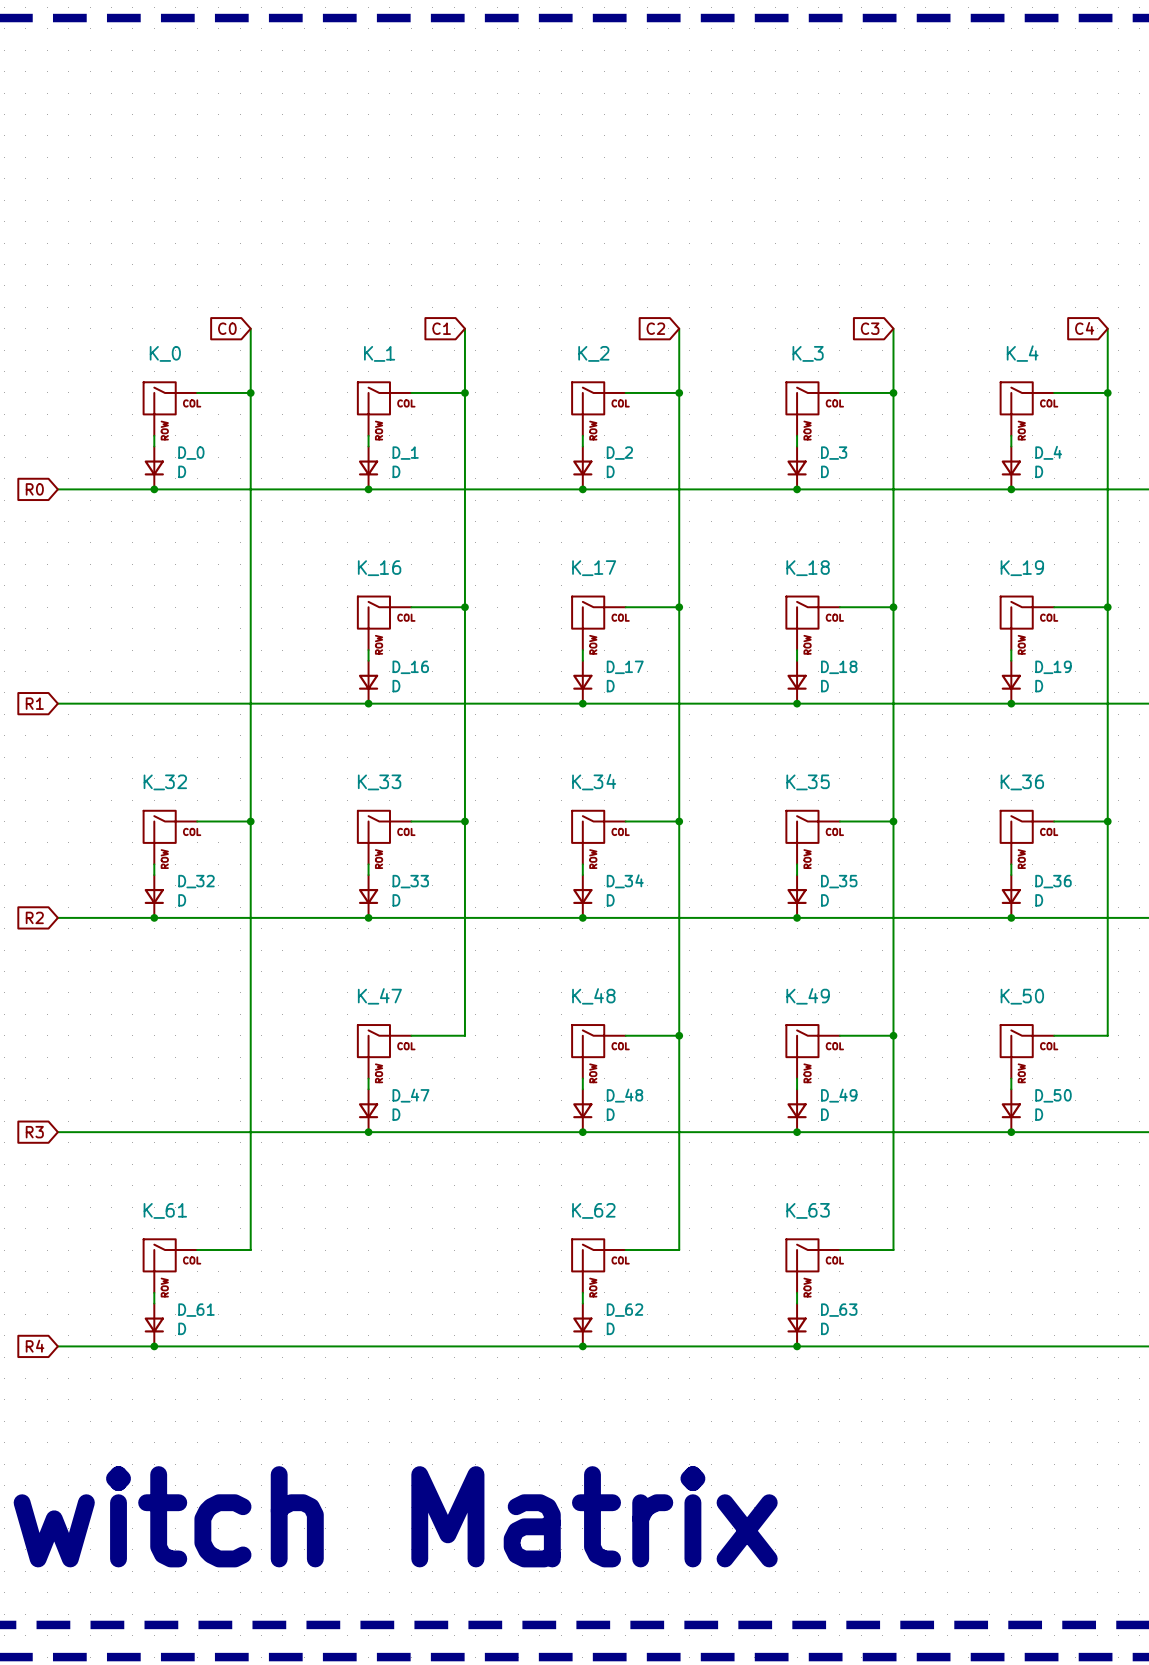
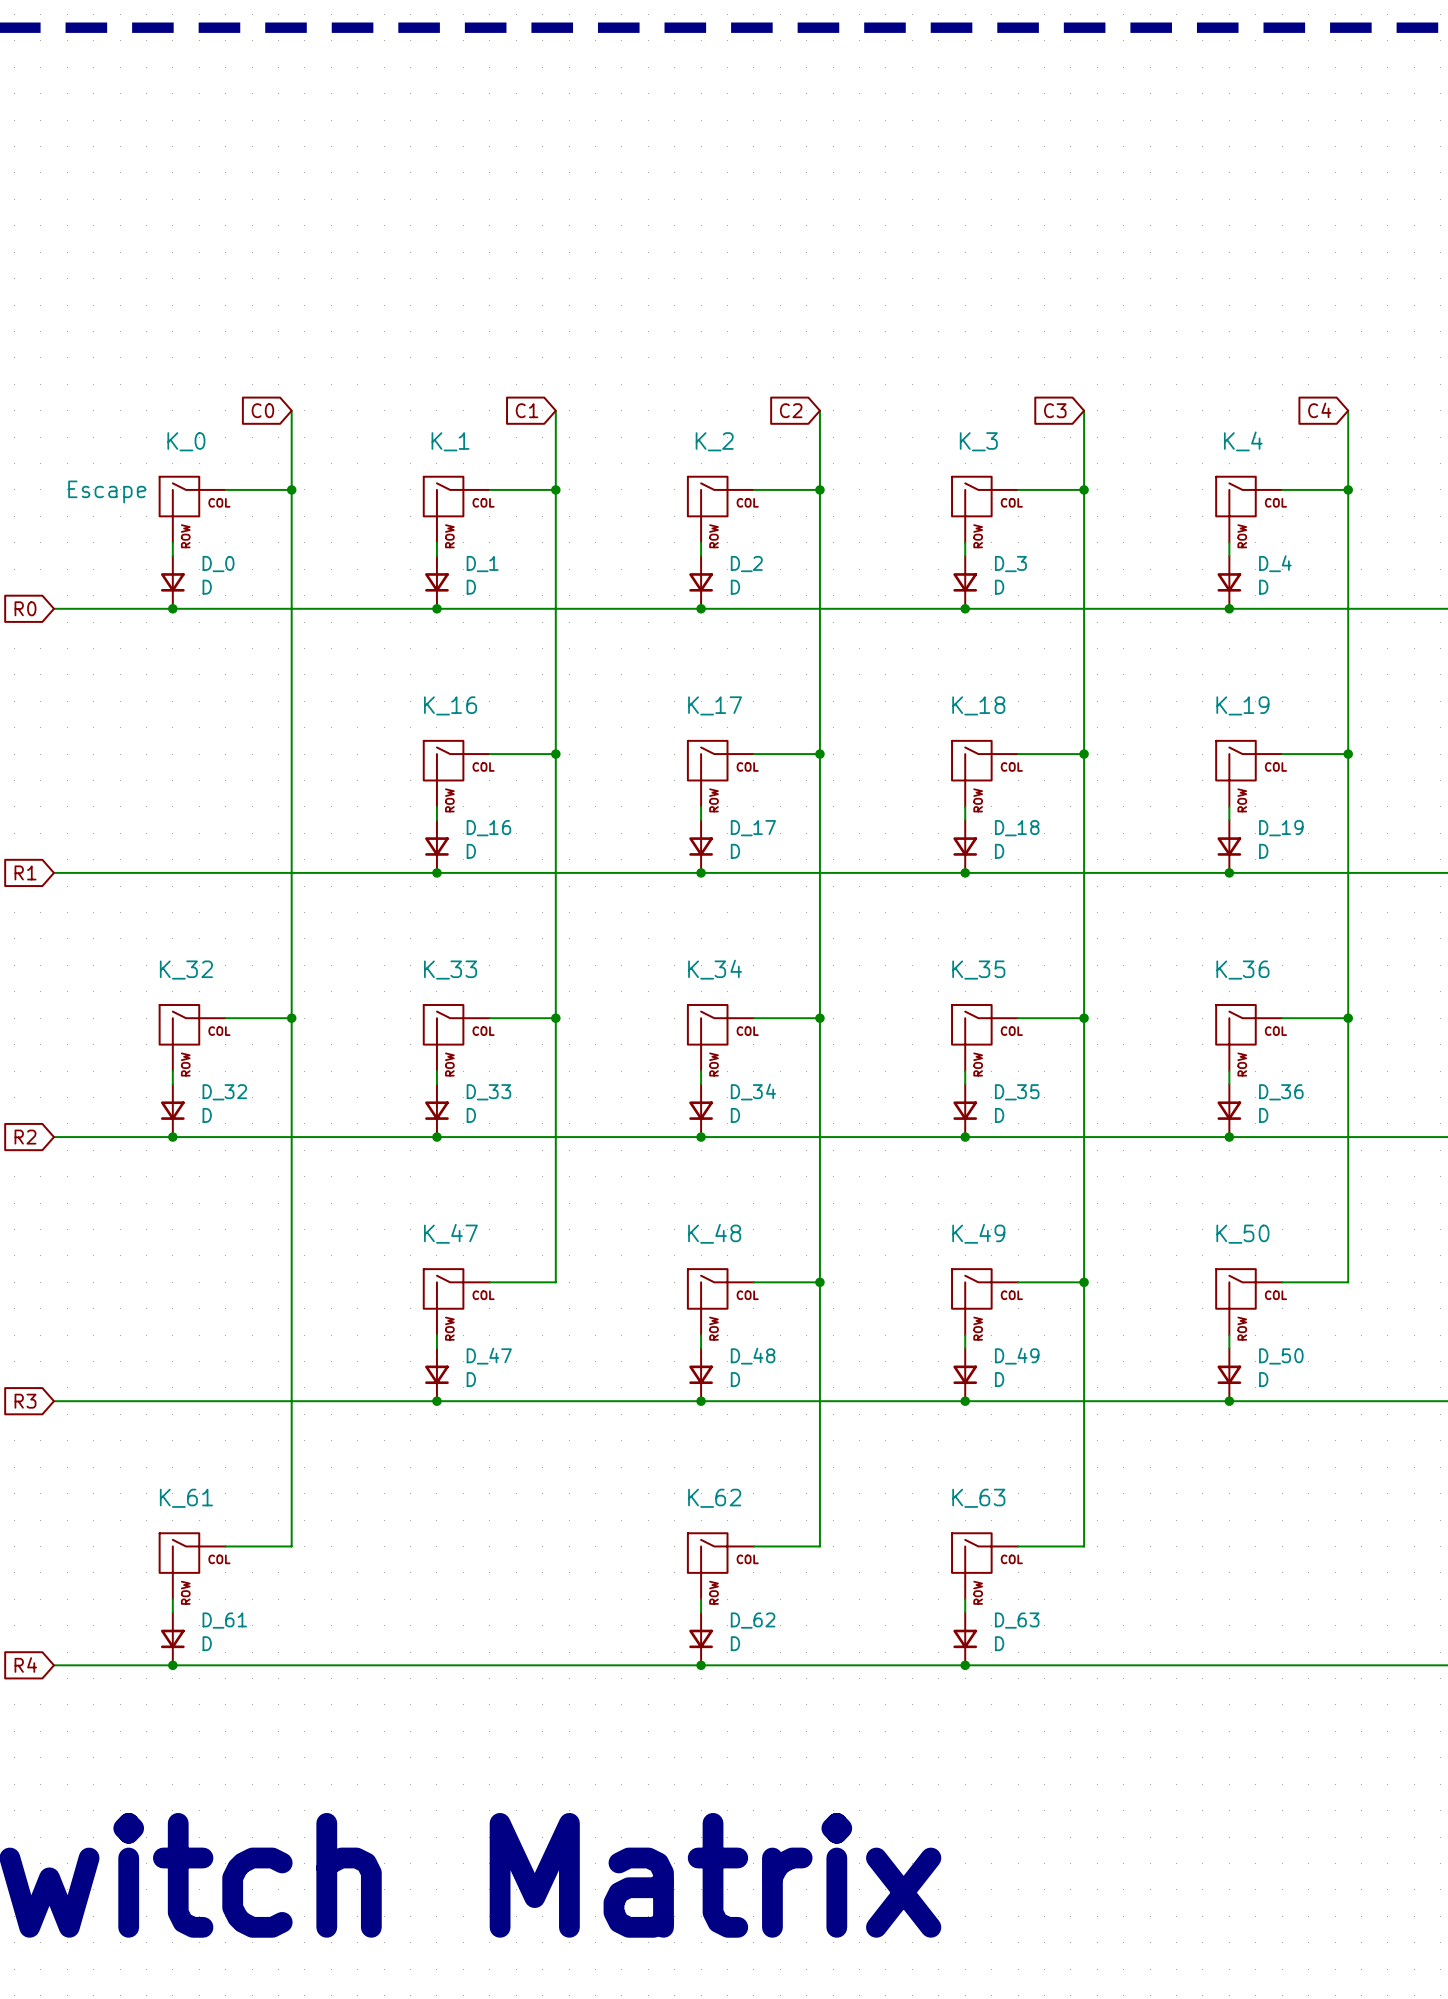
K_0 value: none -> Escape (107, 491)

